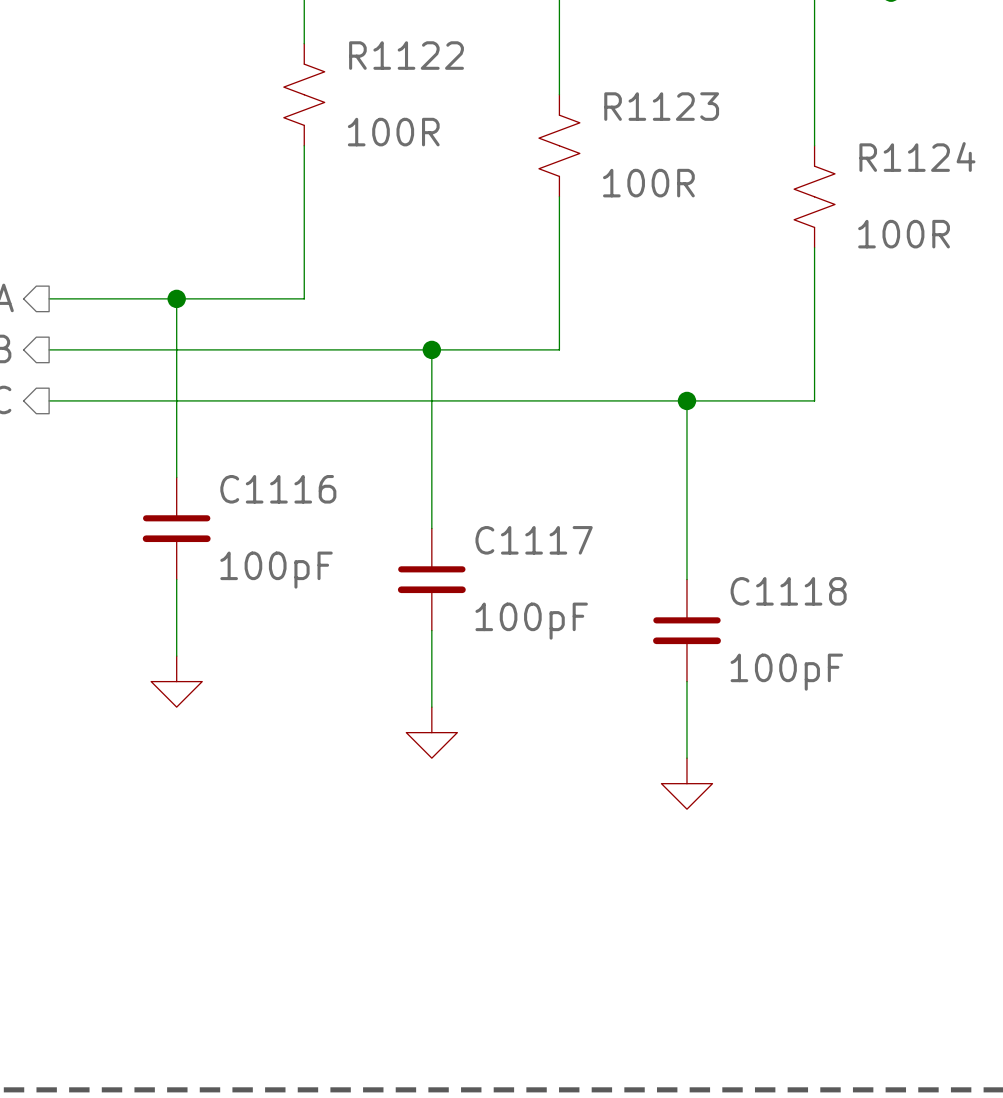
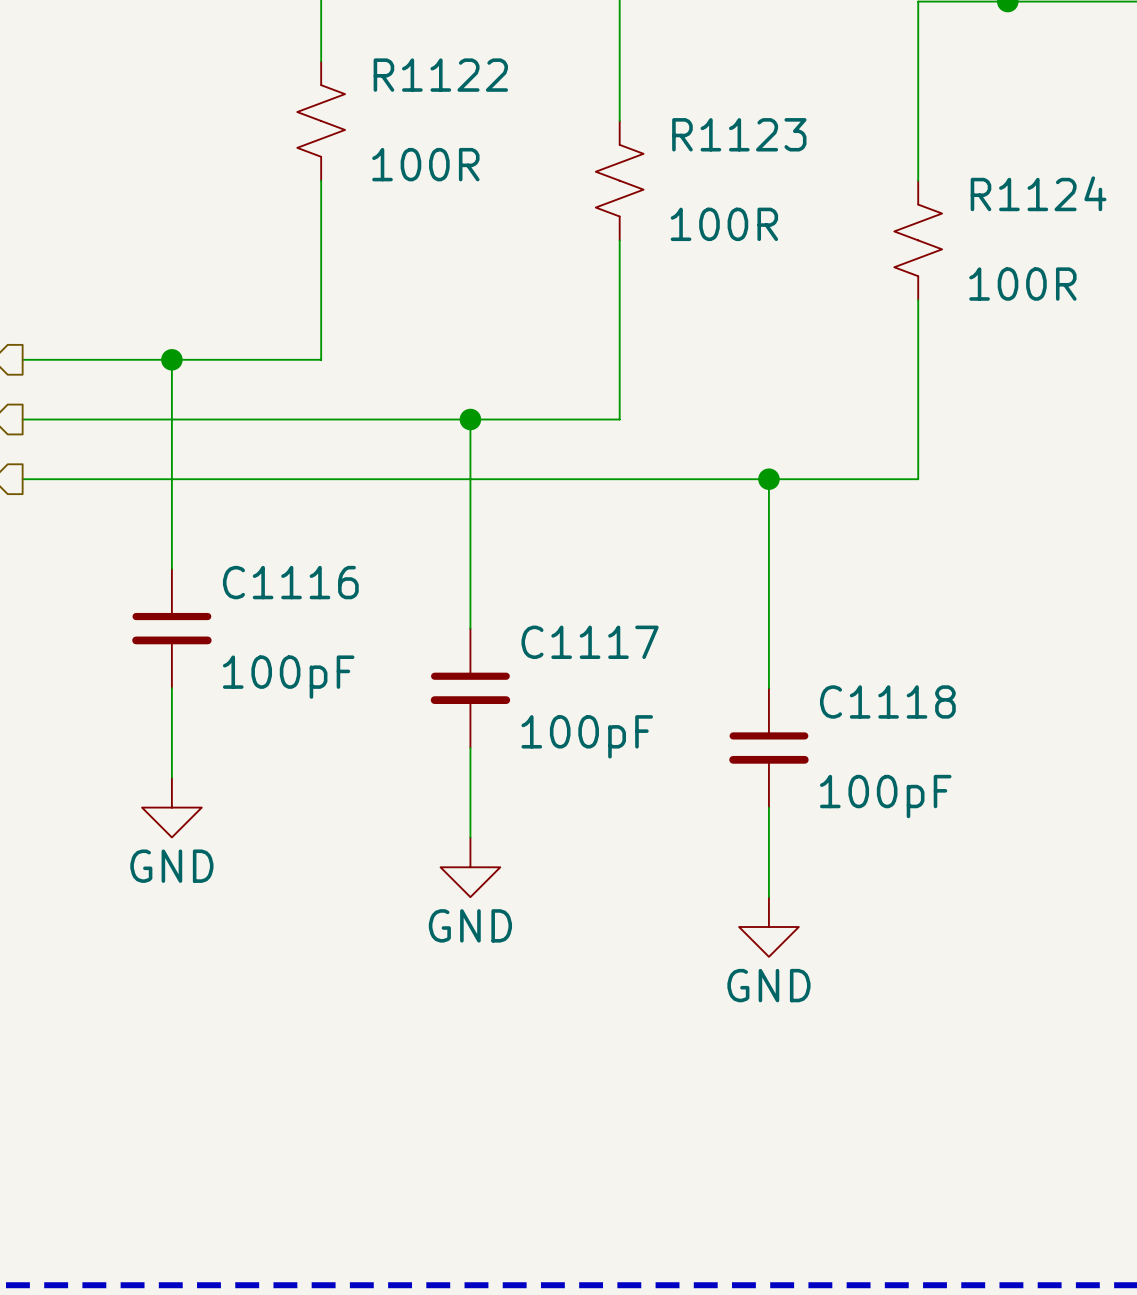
power symbol text: none -> GND (171, 866)
power symbol text: none -> GND (470, 925)
power symbol text: none -> GND (768, 985)

